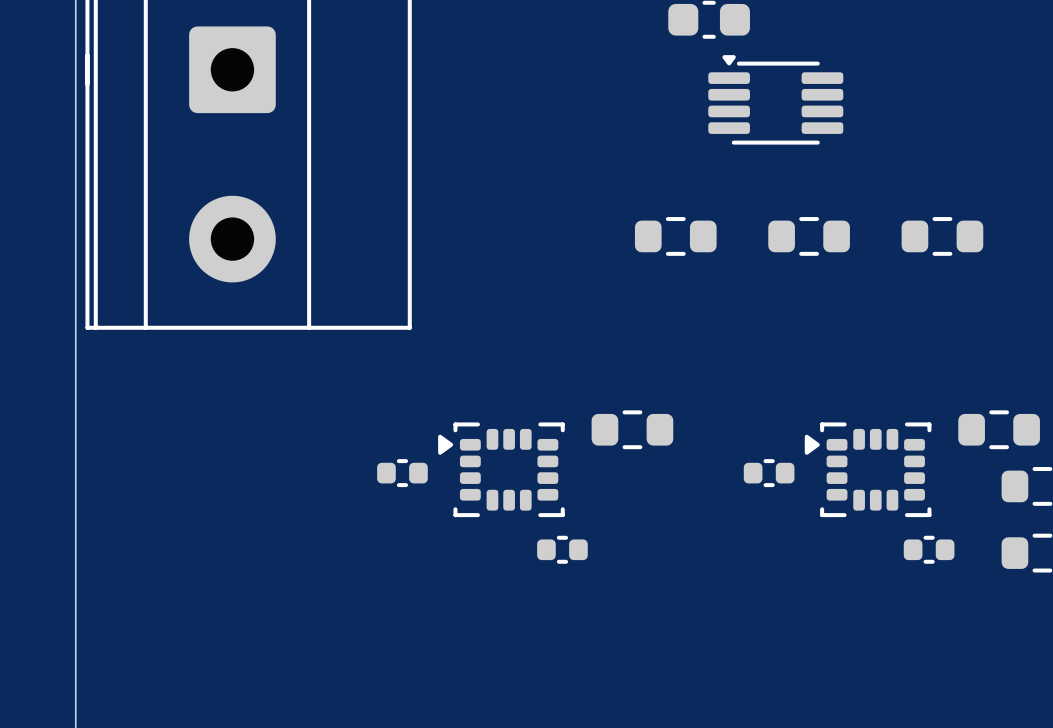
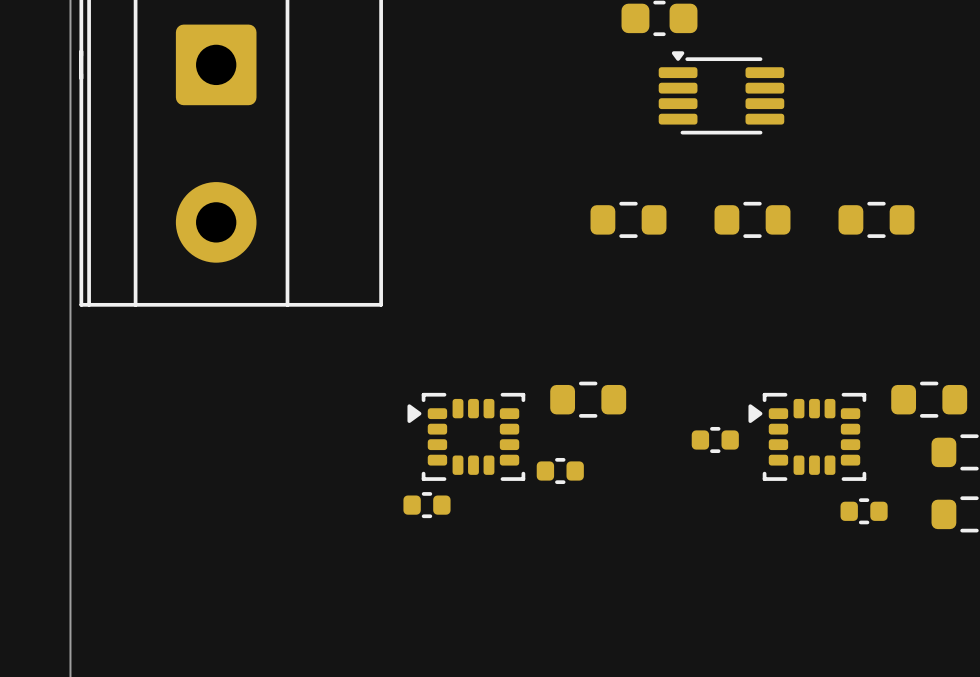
part: (402, 473) -> none
part: none -> (560, 470)
part: none -> (426, 505)
part: (562, 549) -> none

